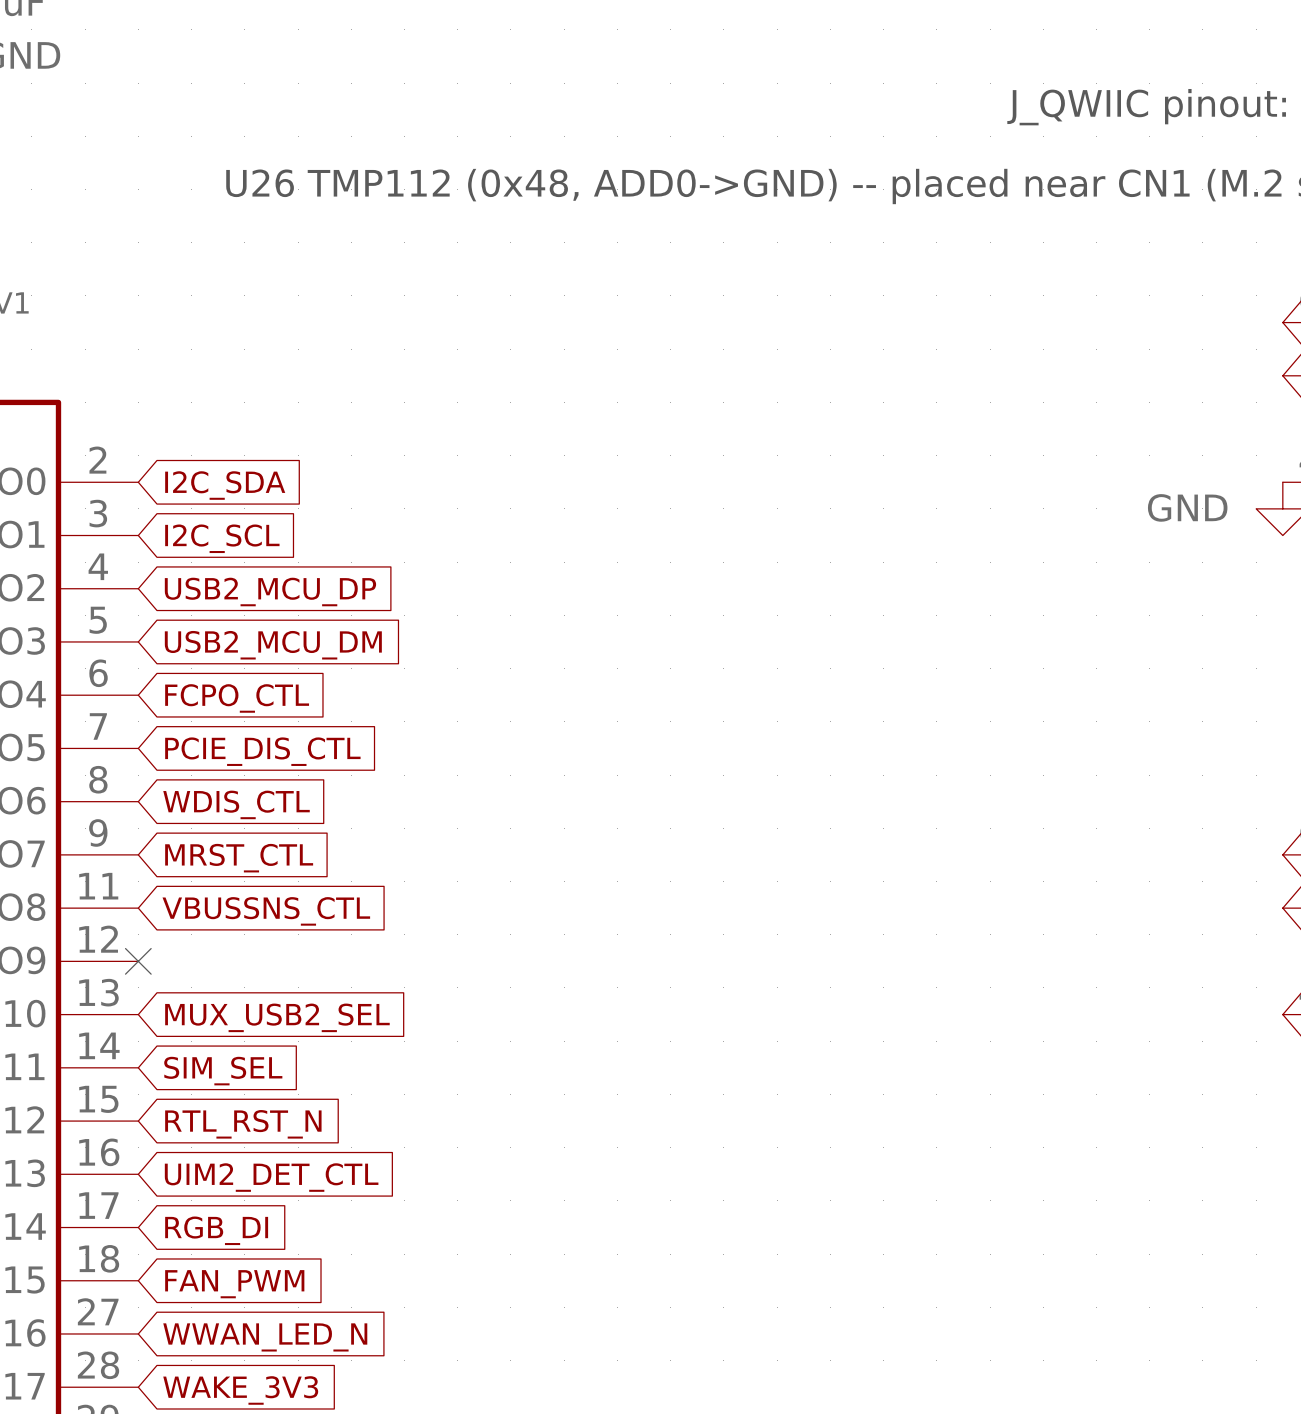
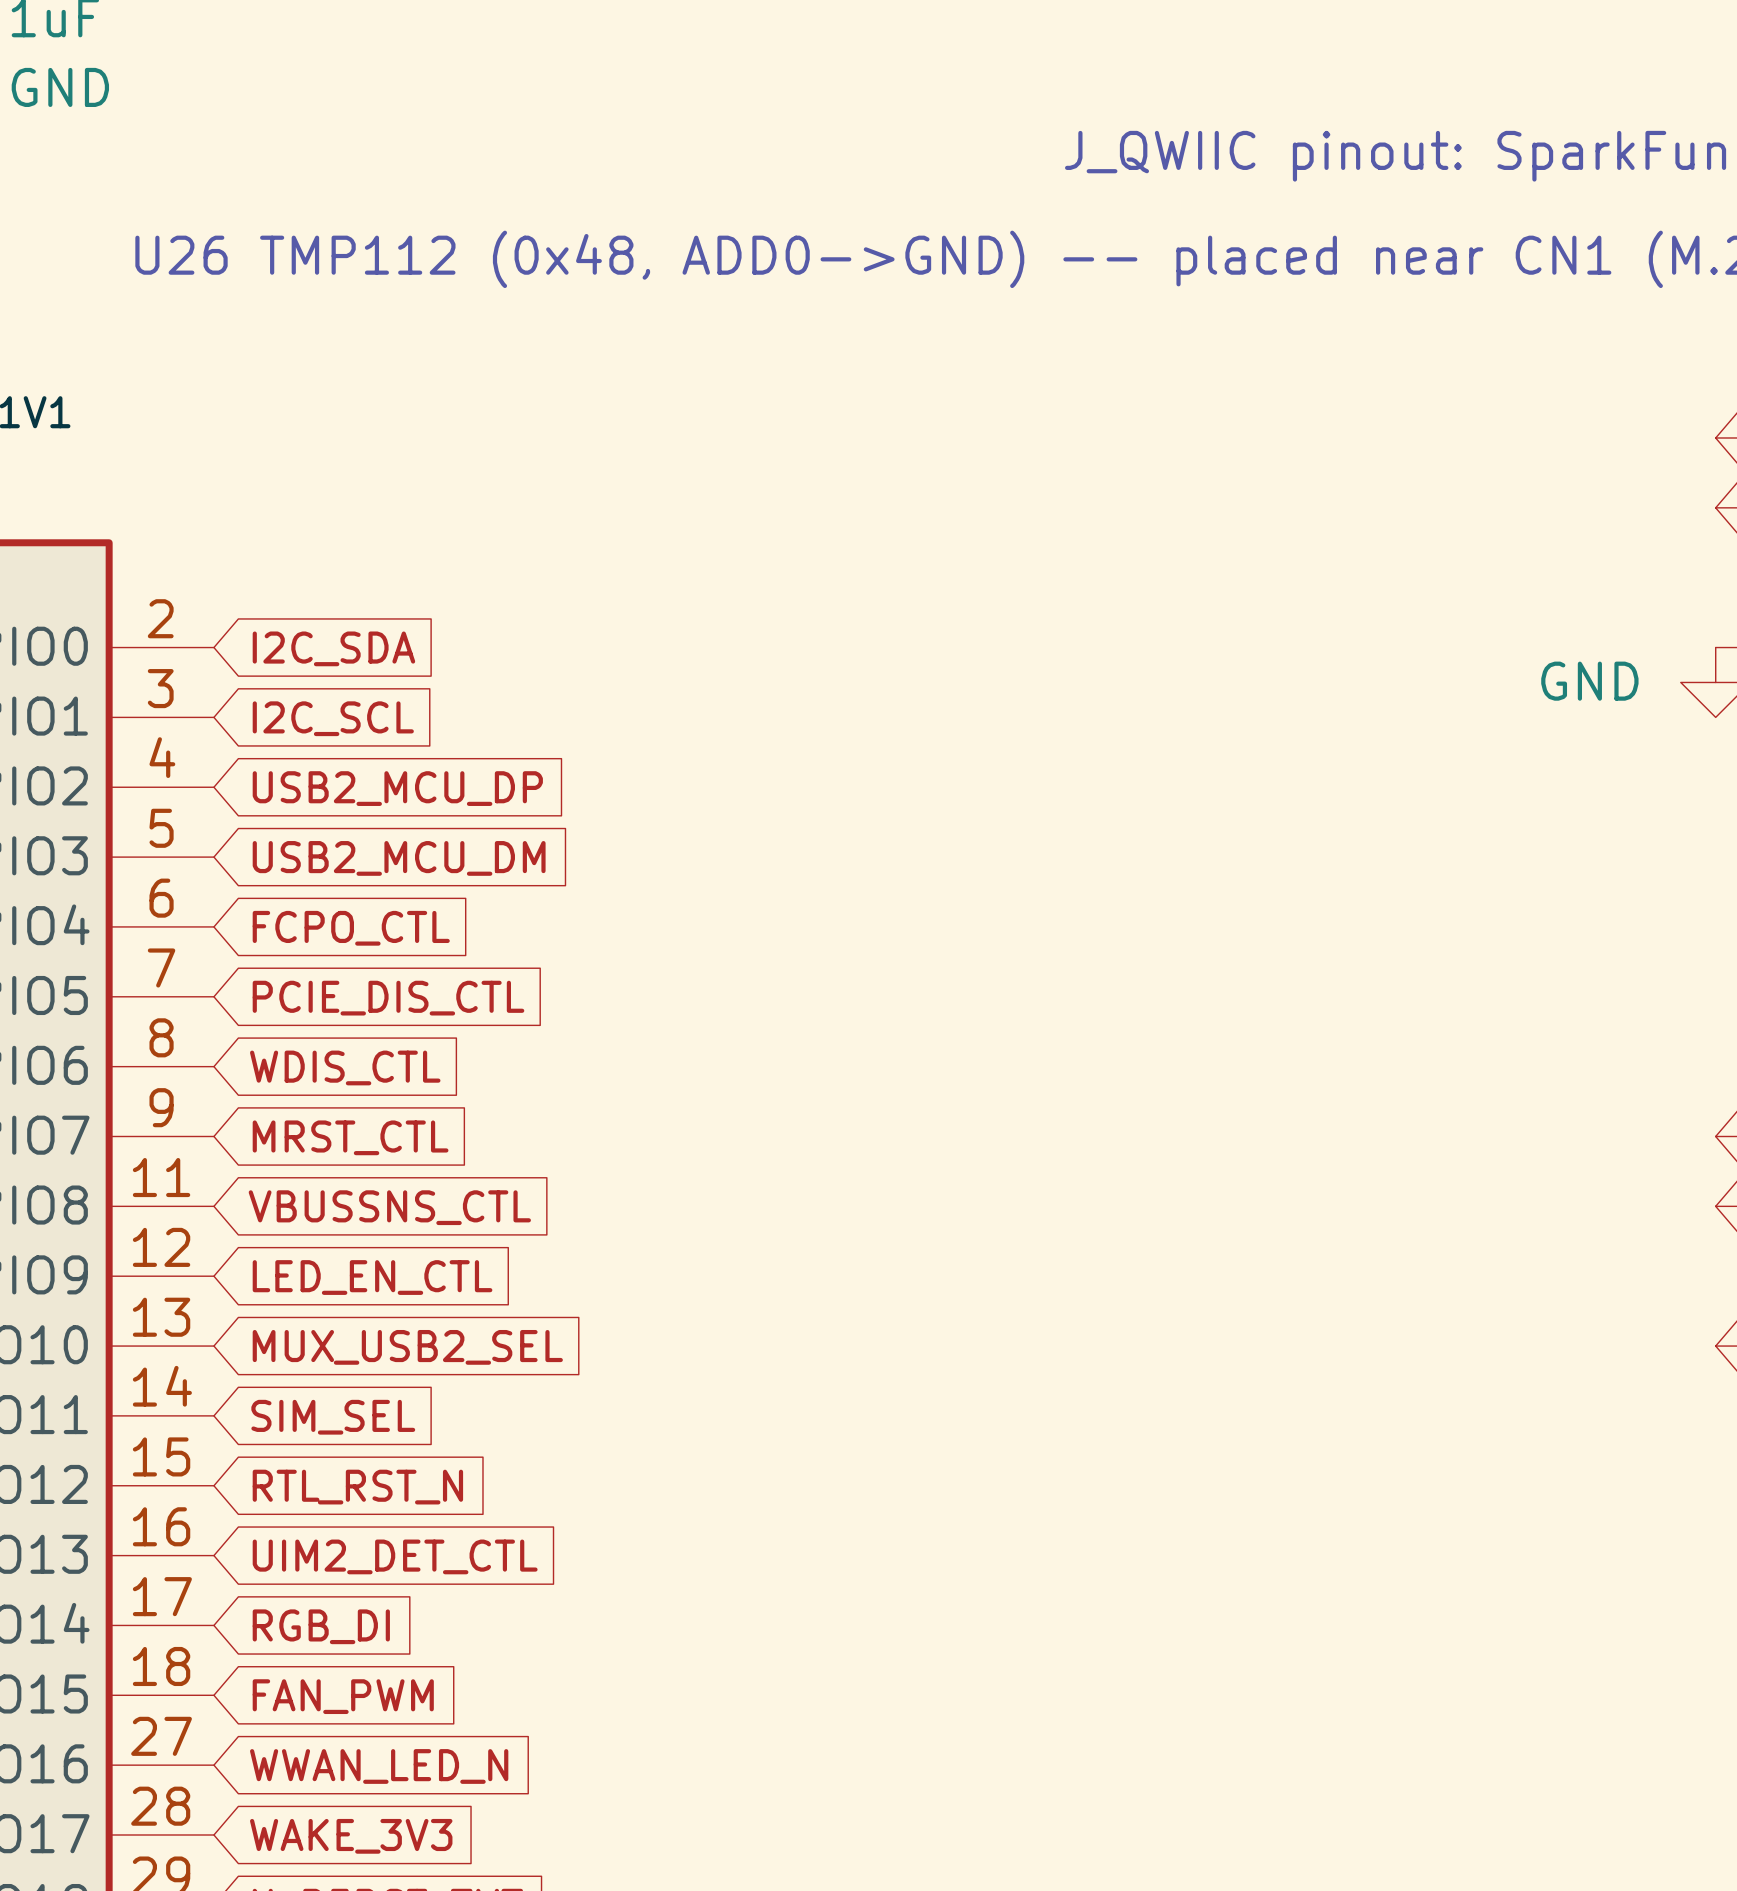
no-connect mark: (138, 961) -> none
global label: none -> LED_EN_CTL (372, 1277)

